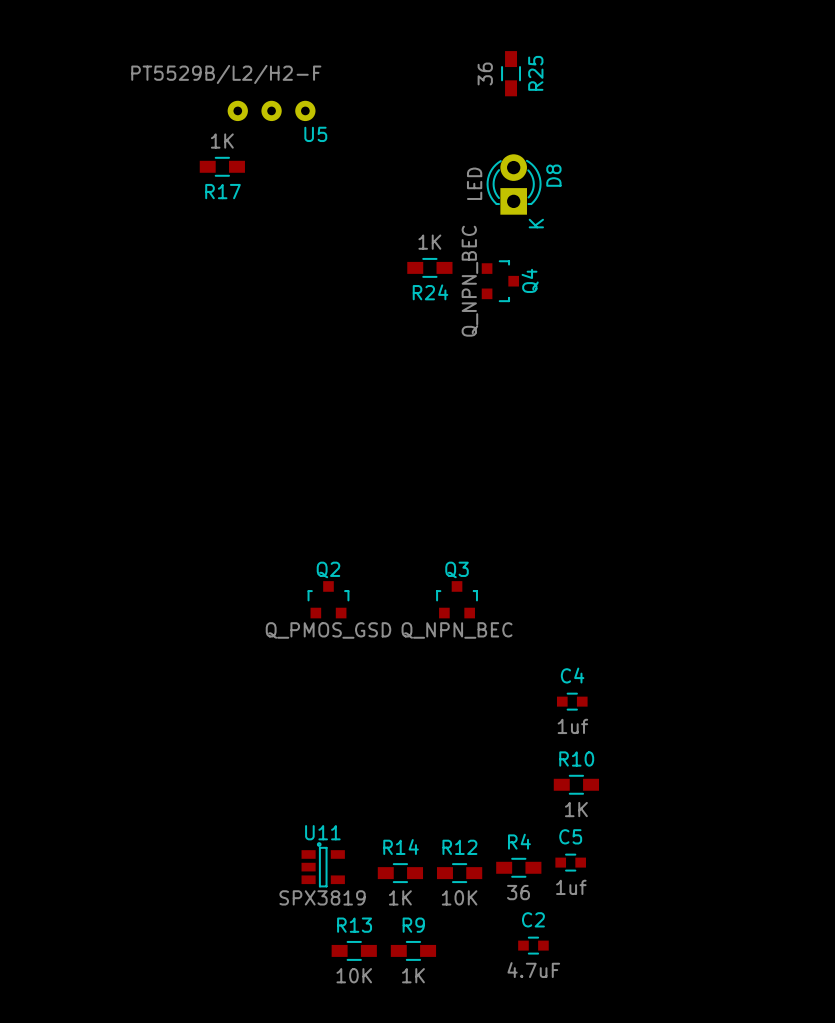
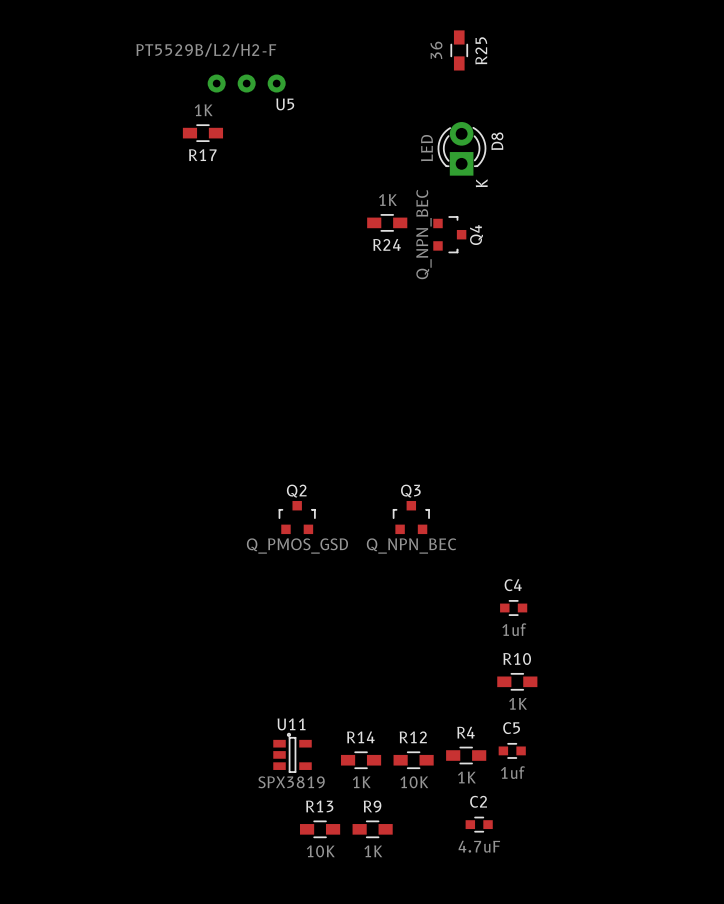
R4 value: 36 (518, 892) -> 1K (466, 777)

